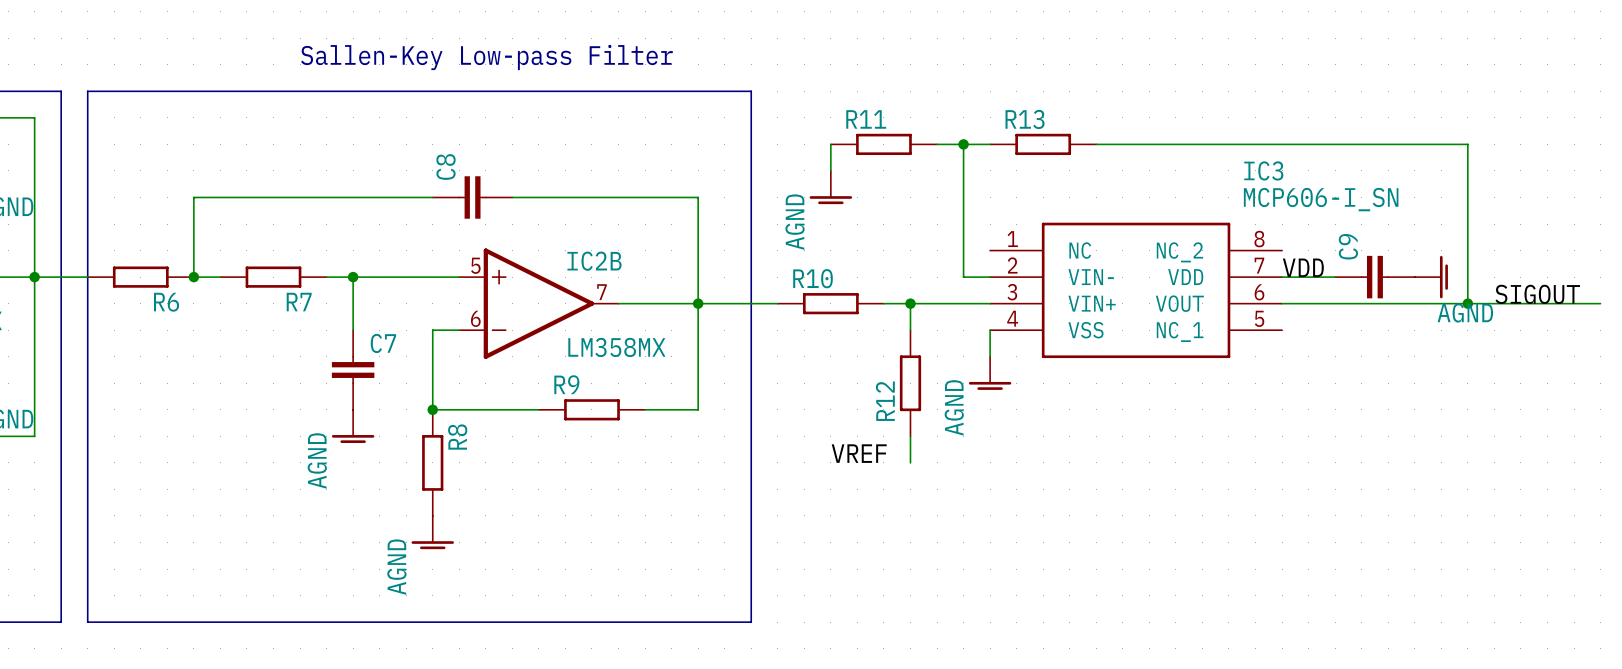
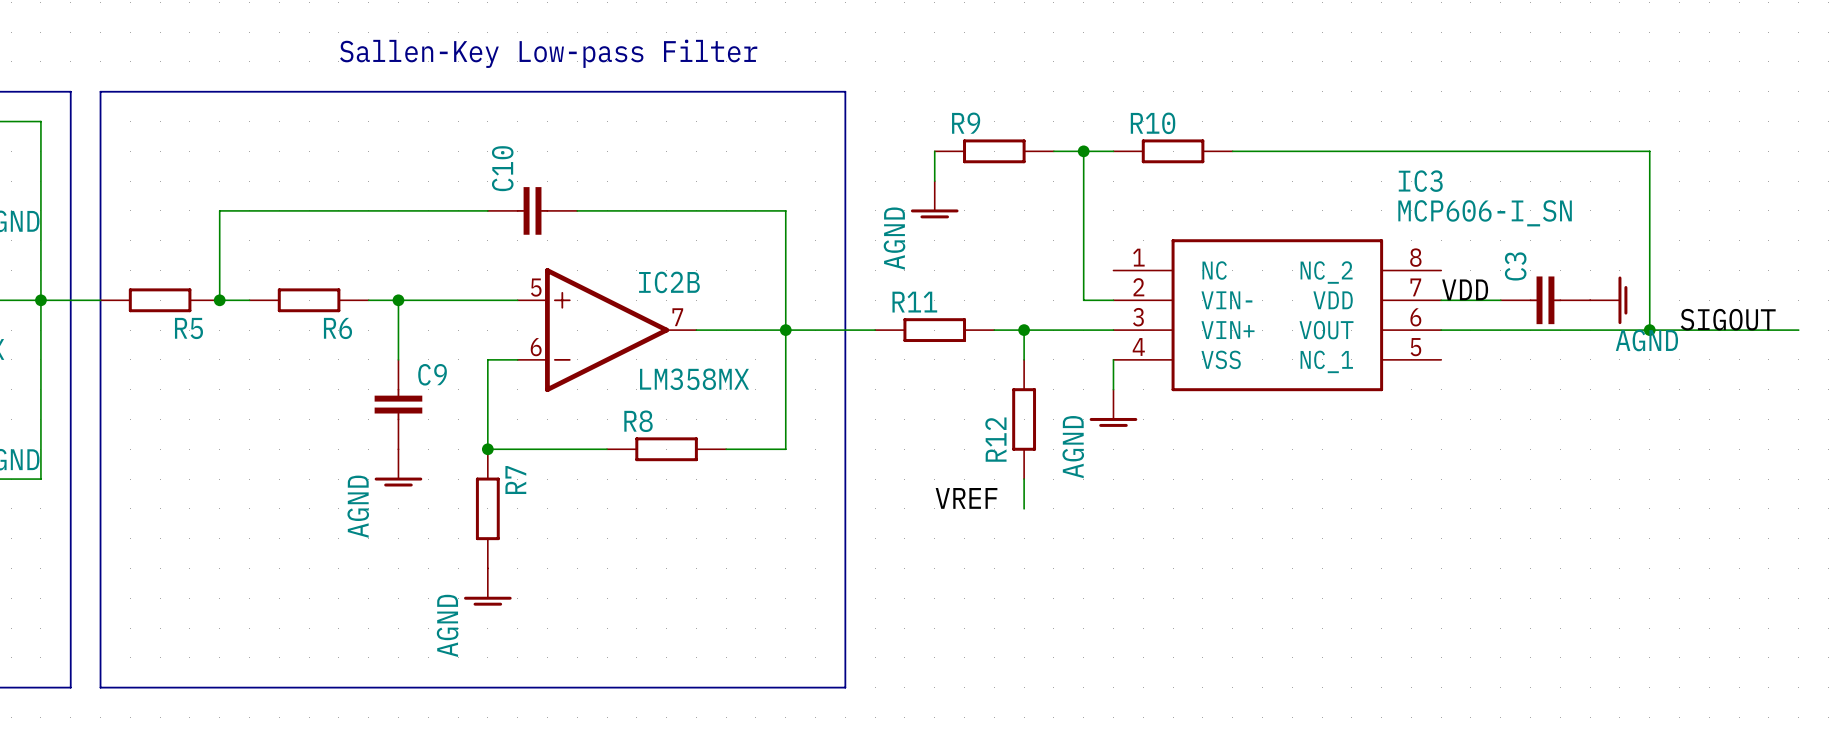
R11 name: R11 (866, 119) -> R9 (966, 123)
R13 name: R13 (1025, 119) -> R10 (1153, 123)
C8 name: C8 (446, 167) -> C10 (502, 168)
C9 name: C9 (1348, 246) -> C3 (1515, 266)
R10 name: R10 (813, 278) -> R11 (914, 302)
R6 name: R6 (166, 302) -> R5 (188, 328)
R7 name: R7 (299, 302) -> R6 (337, 328)
C7 name: C7 (383, 343) -> C9 (432, 374)
R9 name: R9 (566, 384) -> R8 (638, 421)
R8 name: R8 (457, 437) -> R7 (515, 480)

